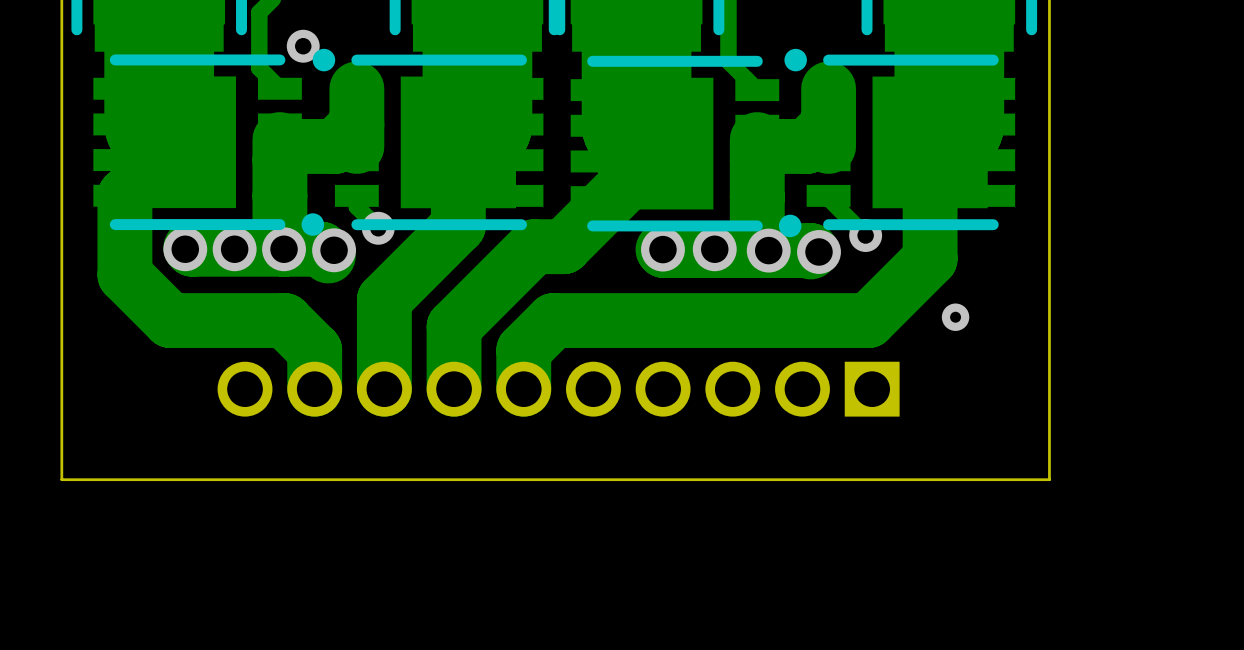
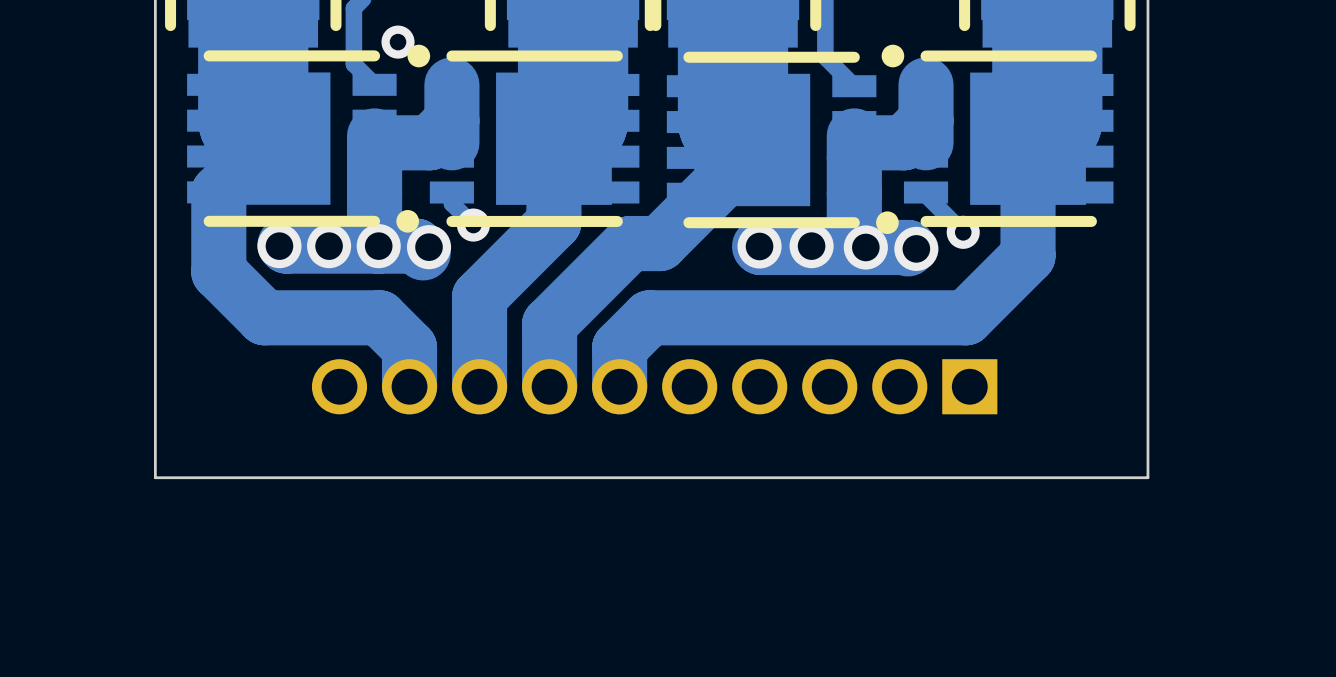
via: (955, 317) -> none

